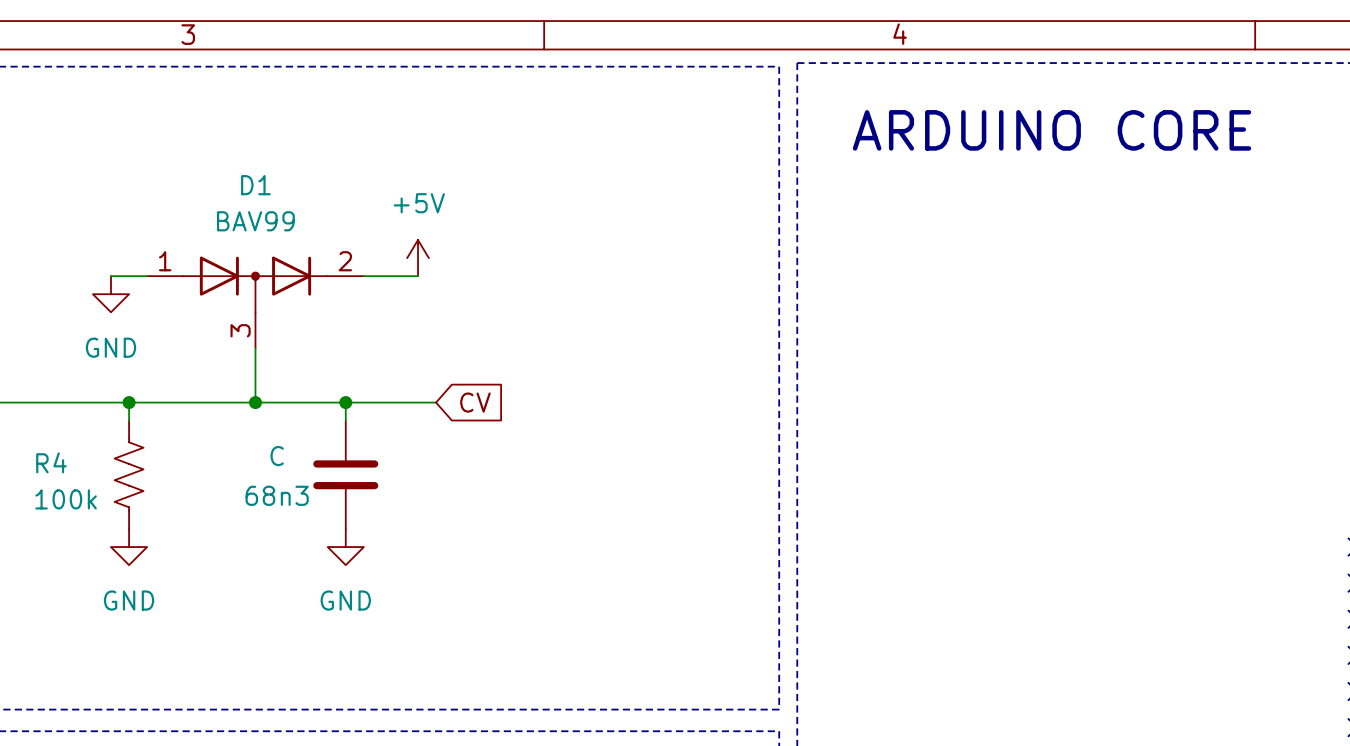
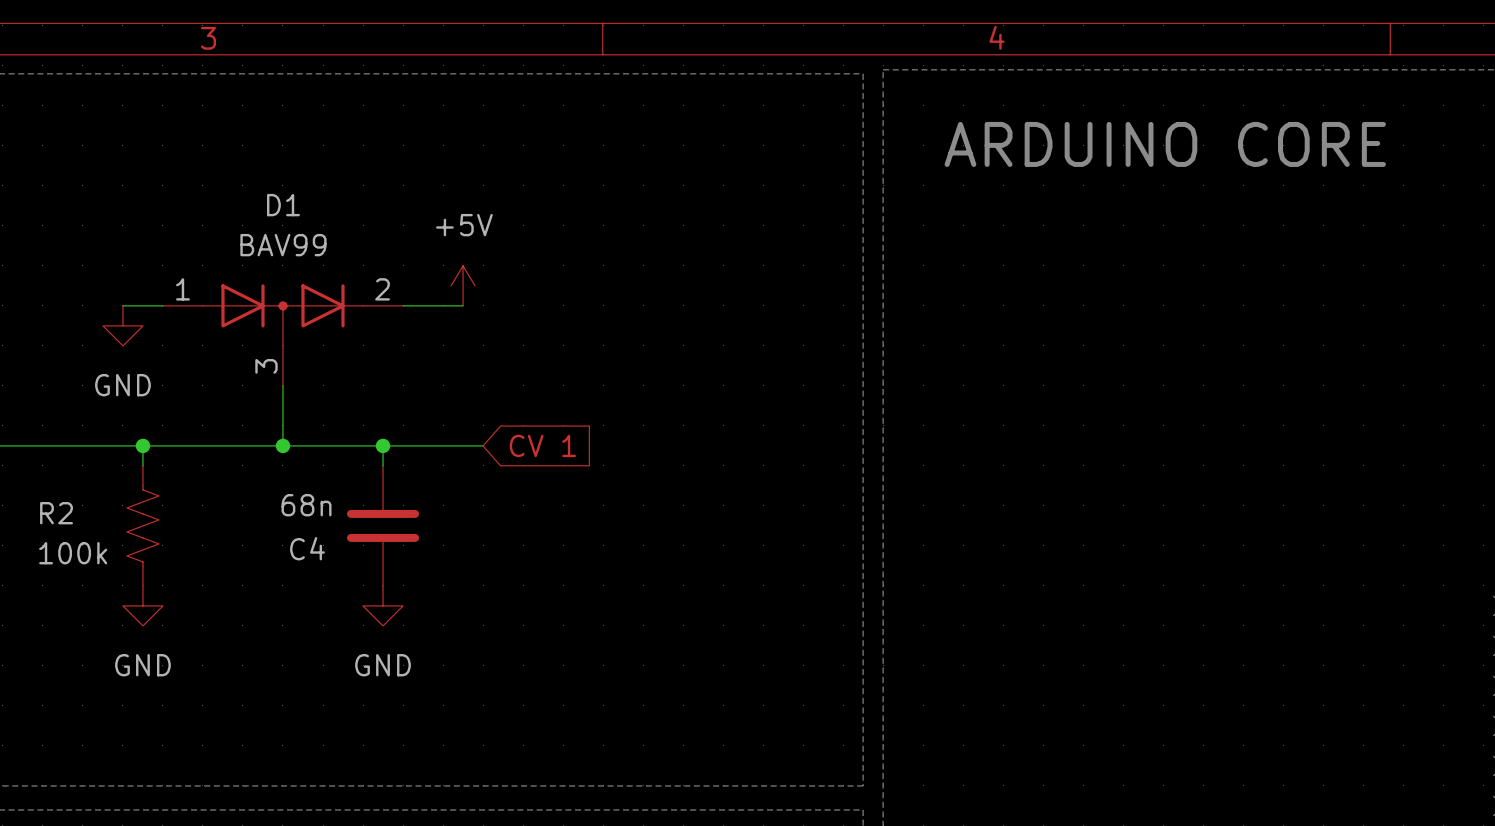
global label: CV (475, 402) -> CV 1 (542, 445)
68n3 value: C (277, 456) -> 68n (306, 505)
R4 name: R4 (51, 462) -> R2 (56, 513)
68n3 name: 68n3 (277, 495) -> C4 (307, 548)

